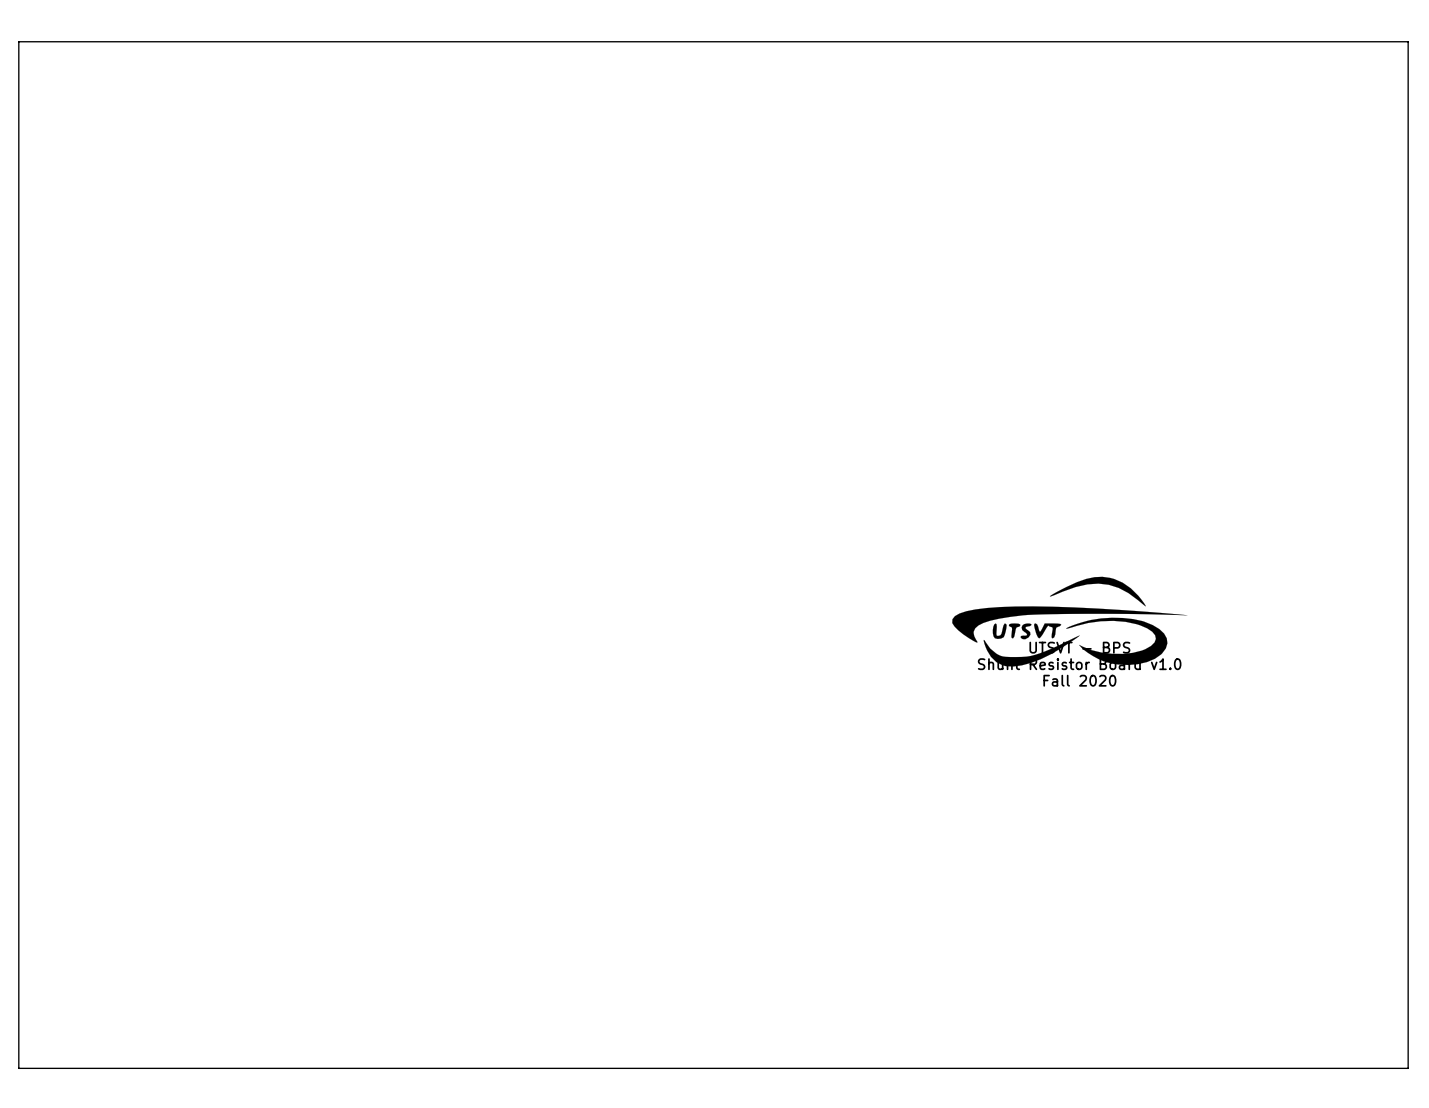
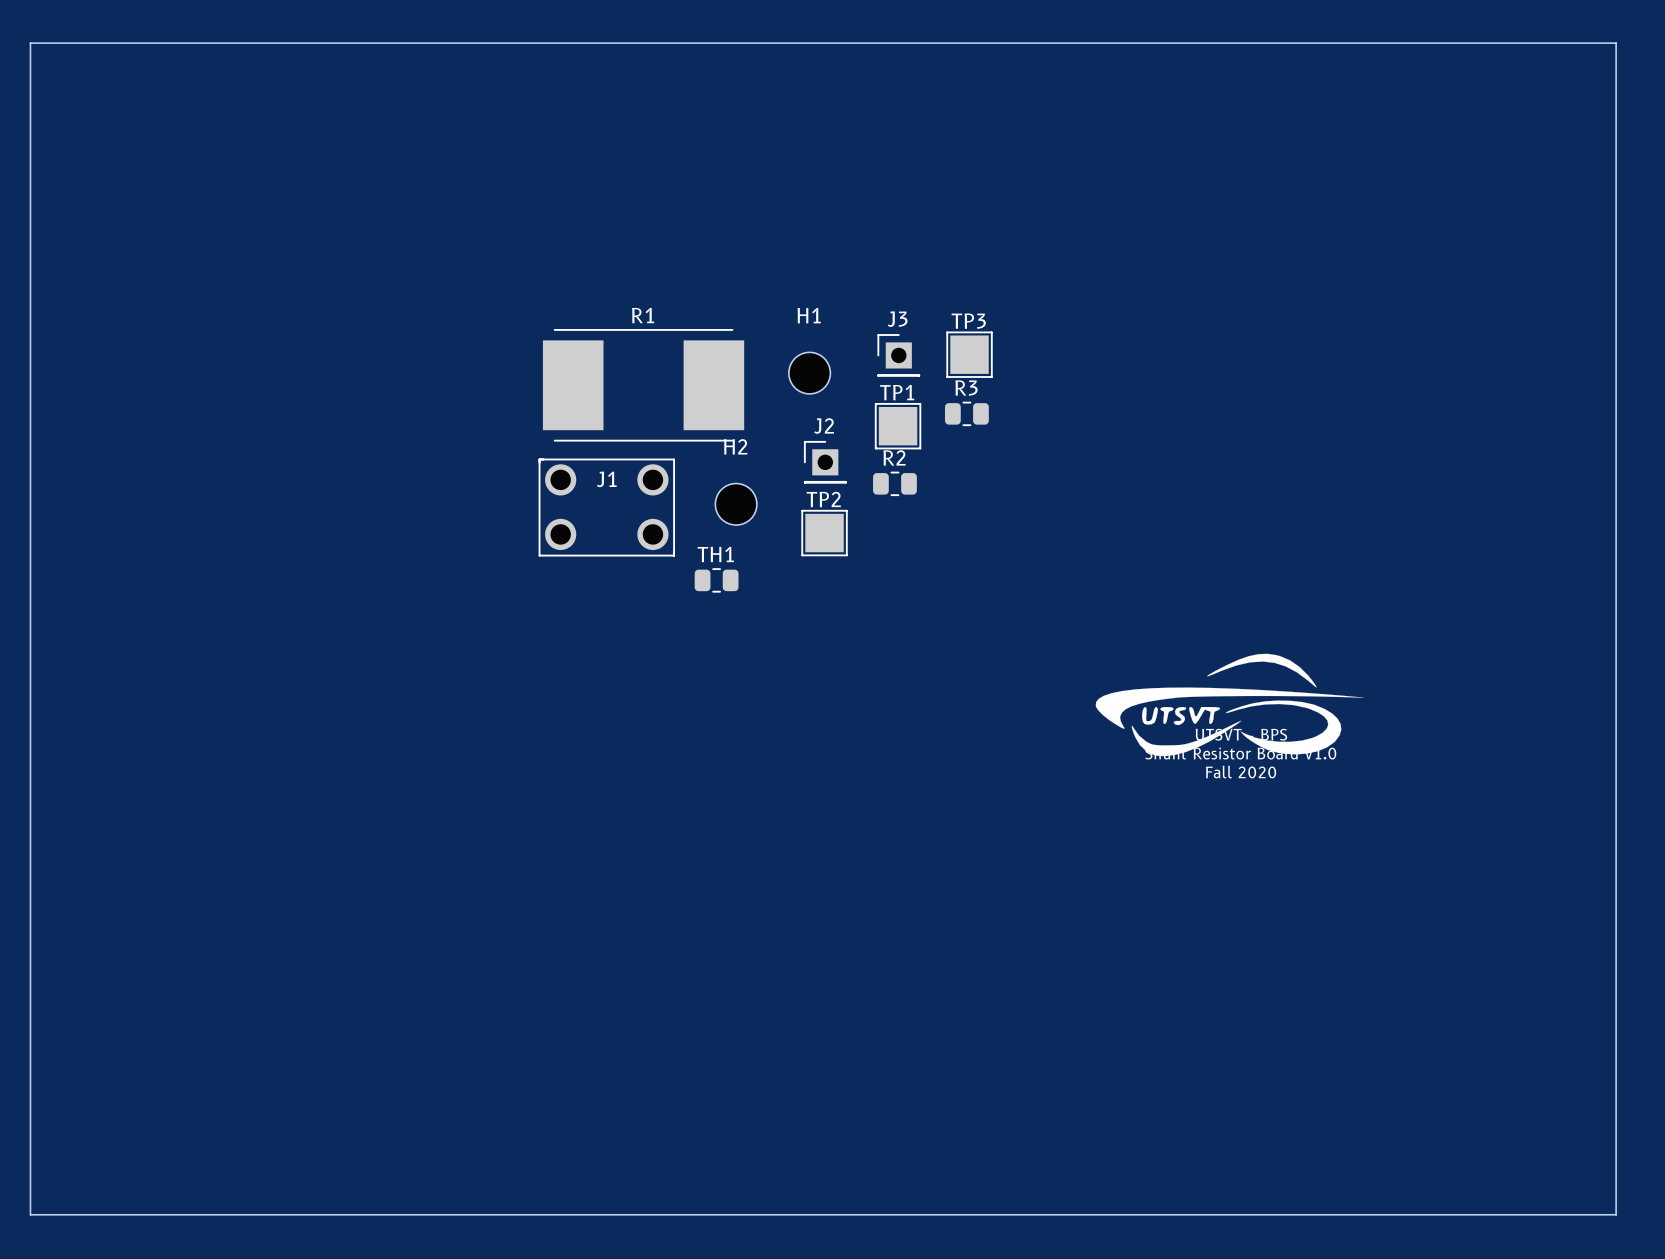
TP3: none -> (969, 354)
J3: none -> (898, 355)
H1: none -> (809, 373)
R1: none -> (643, 385)
R3: none -> (966, 413)
TP1: none -> (898, 426)
J2: none -> (825, 462)
R2: none -> (894, 483)
H2: none -> (736, 504)
J1: none -> (606, 507)
TP2: none -> (824, 533)
TH1: none -> (716, 580)

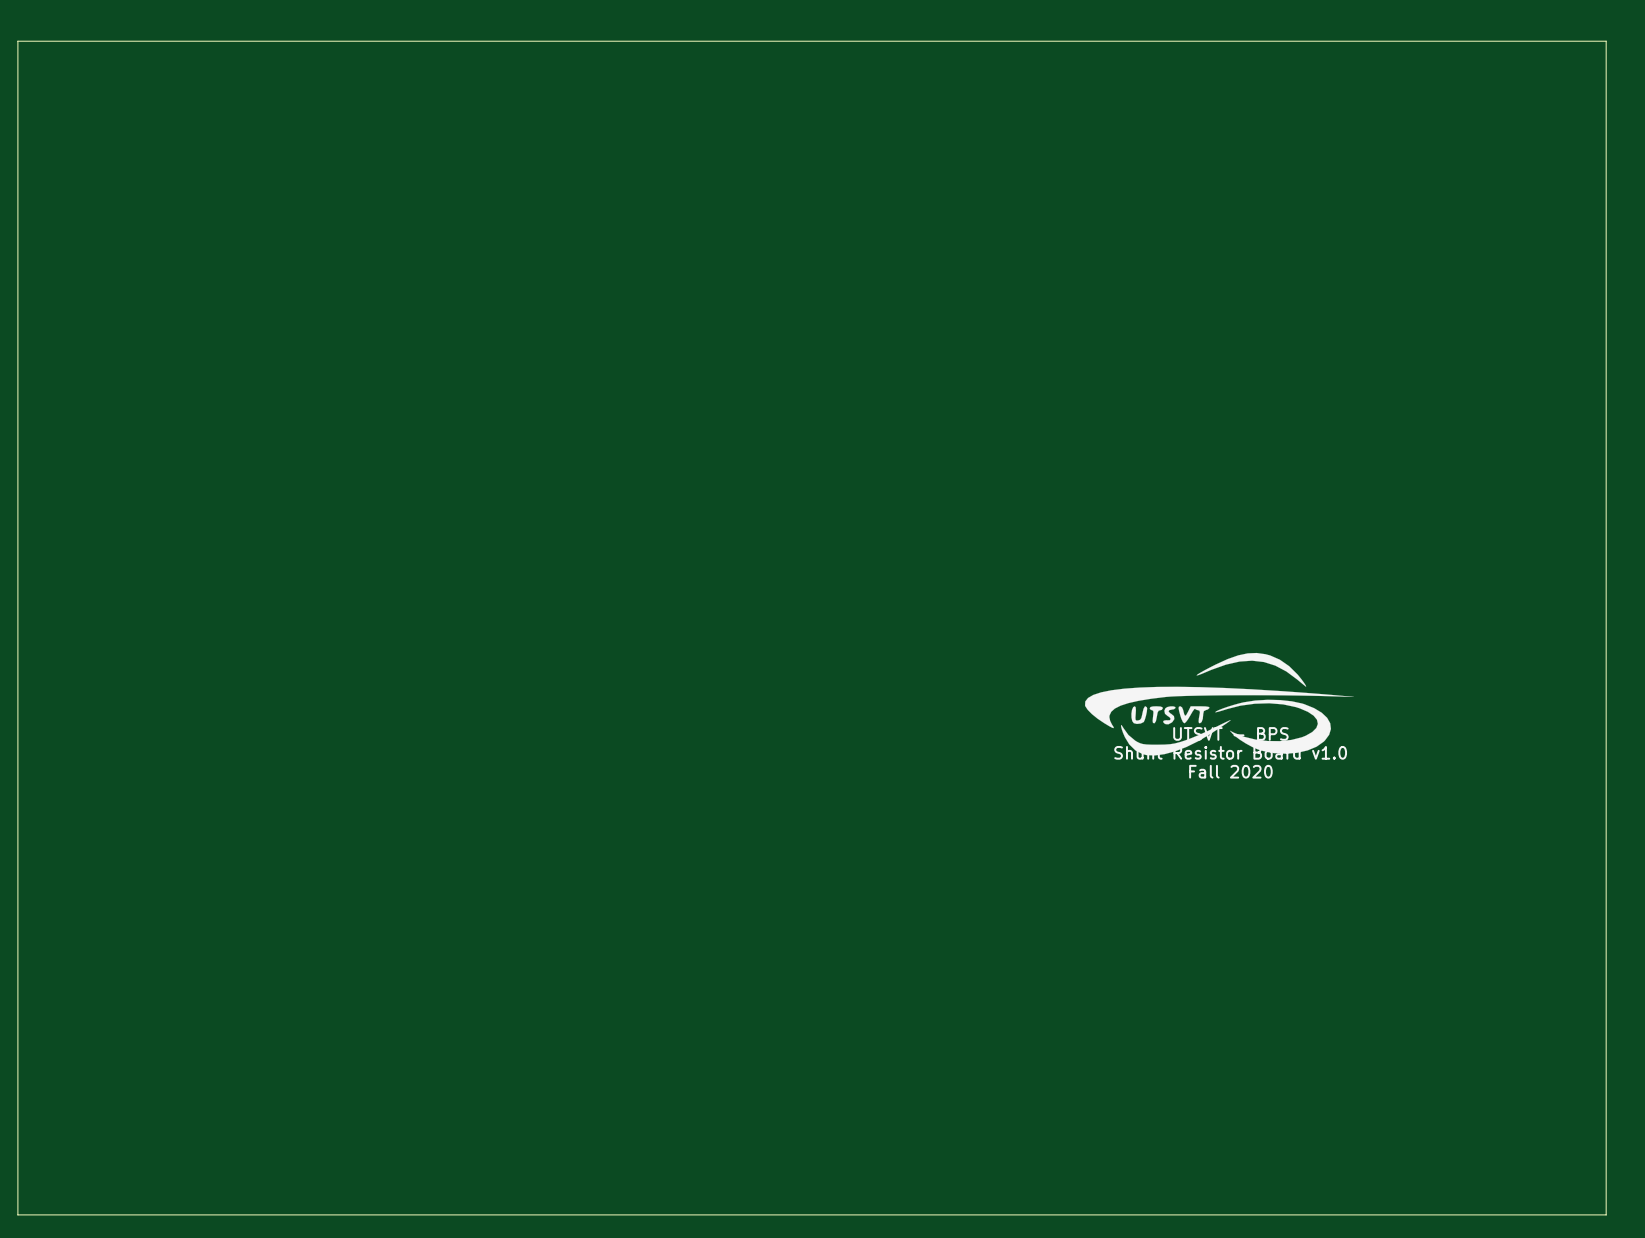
TP3: (969, 354) -> none
J3: (898, 355) -> none
H1: (809, 373) -> none
R1: (643, 385) -> none
R3: (966, 413) -> none
TP1: (898, 426) -> none
J2: (825, 462) -> none
R2: (894, 483) -> none
H2: (736, 504) -> none
J1: (606, 507) -> none
TP2: (824, 533) -> none
TH1: (716, 580) -> none

